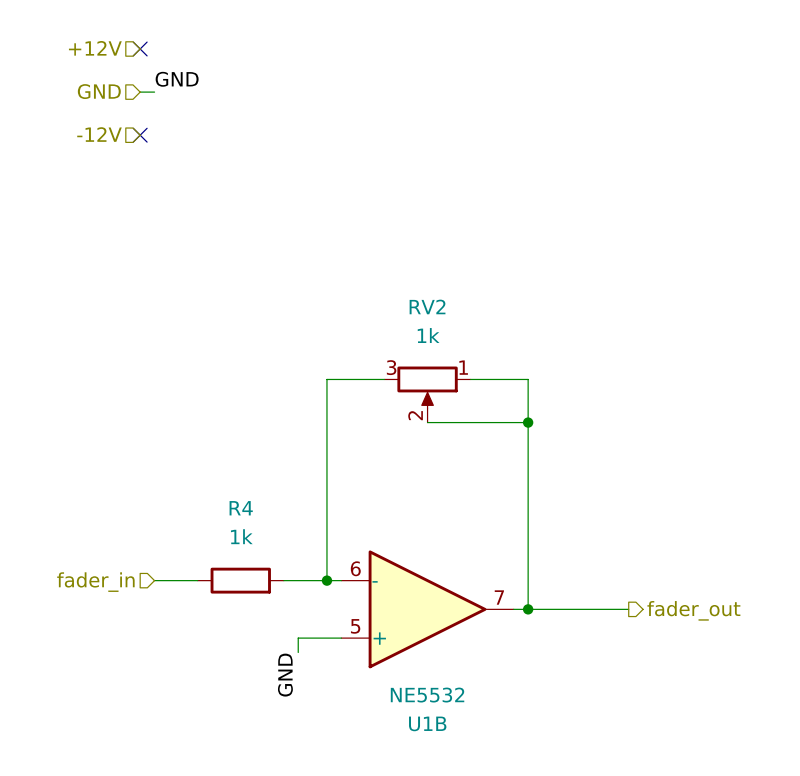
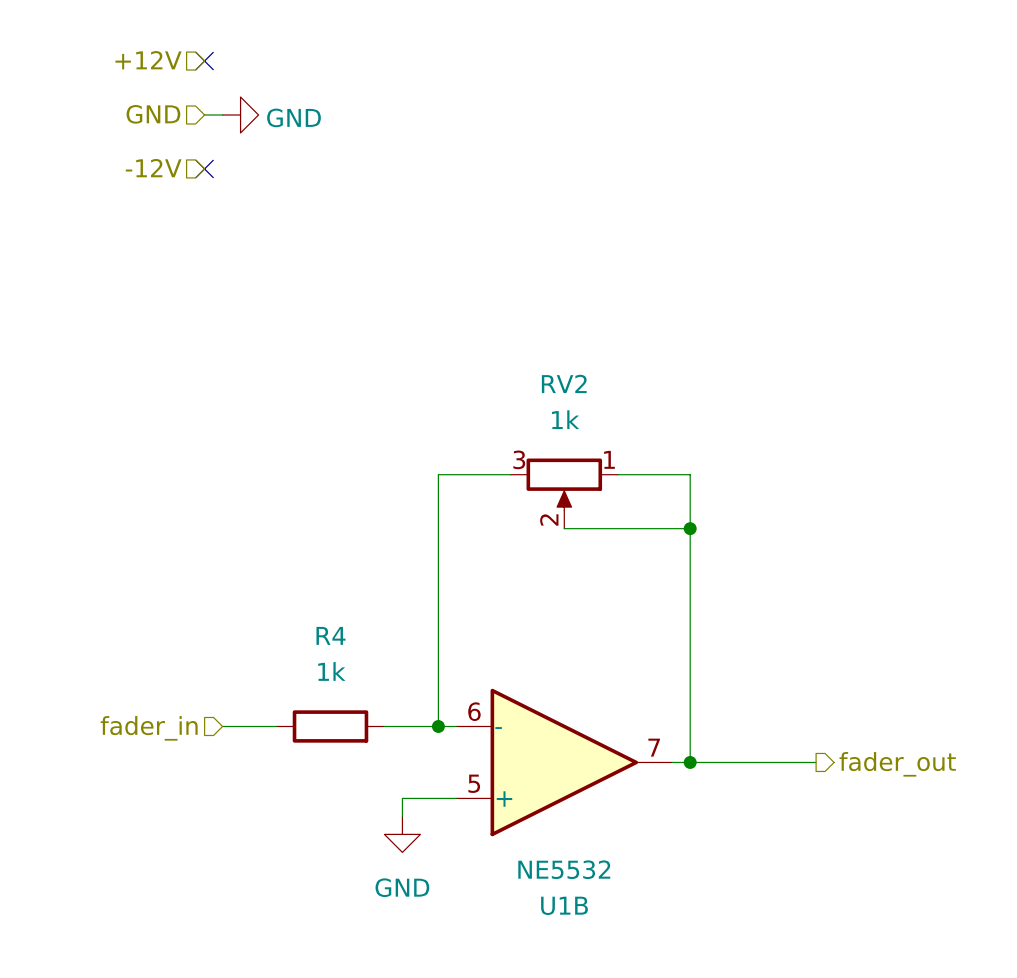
label: GND (177, 79) -> none
power symbol: none -> GND (240, 114)
power symbol: none -> GND (402, 834)
label: GND (285, 675) -> none

